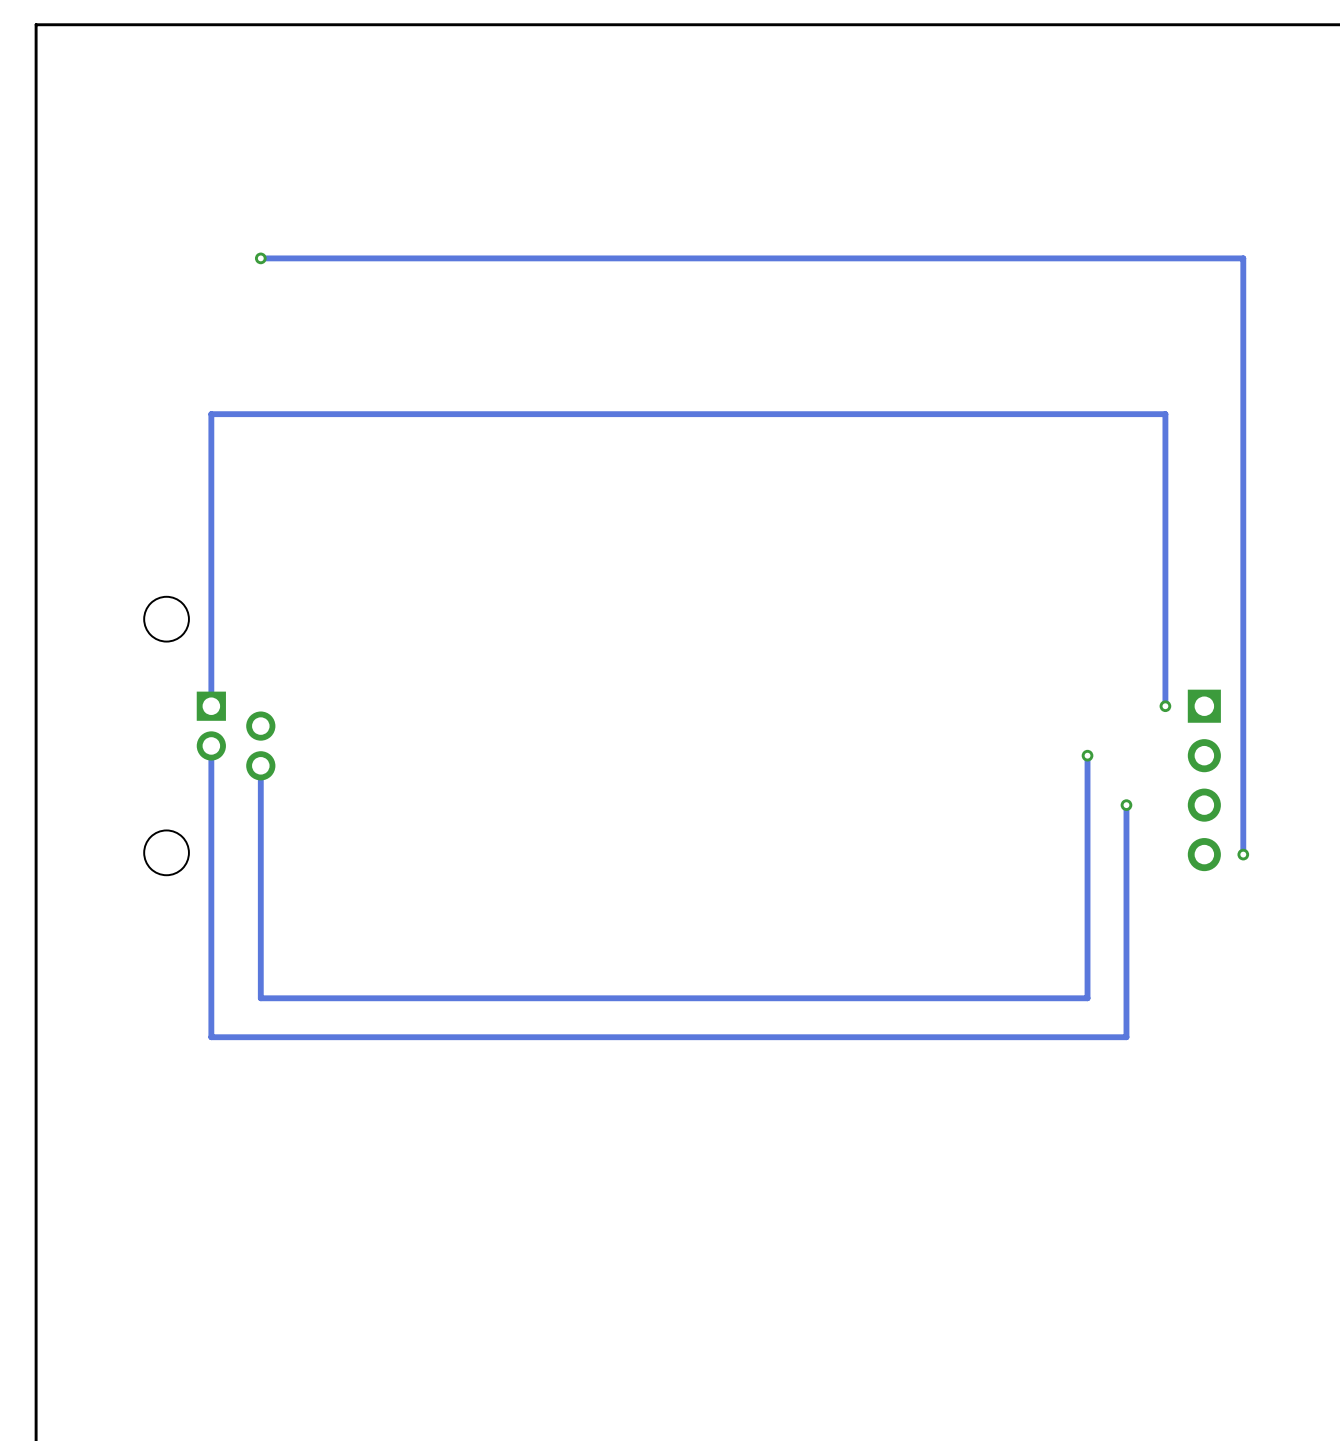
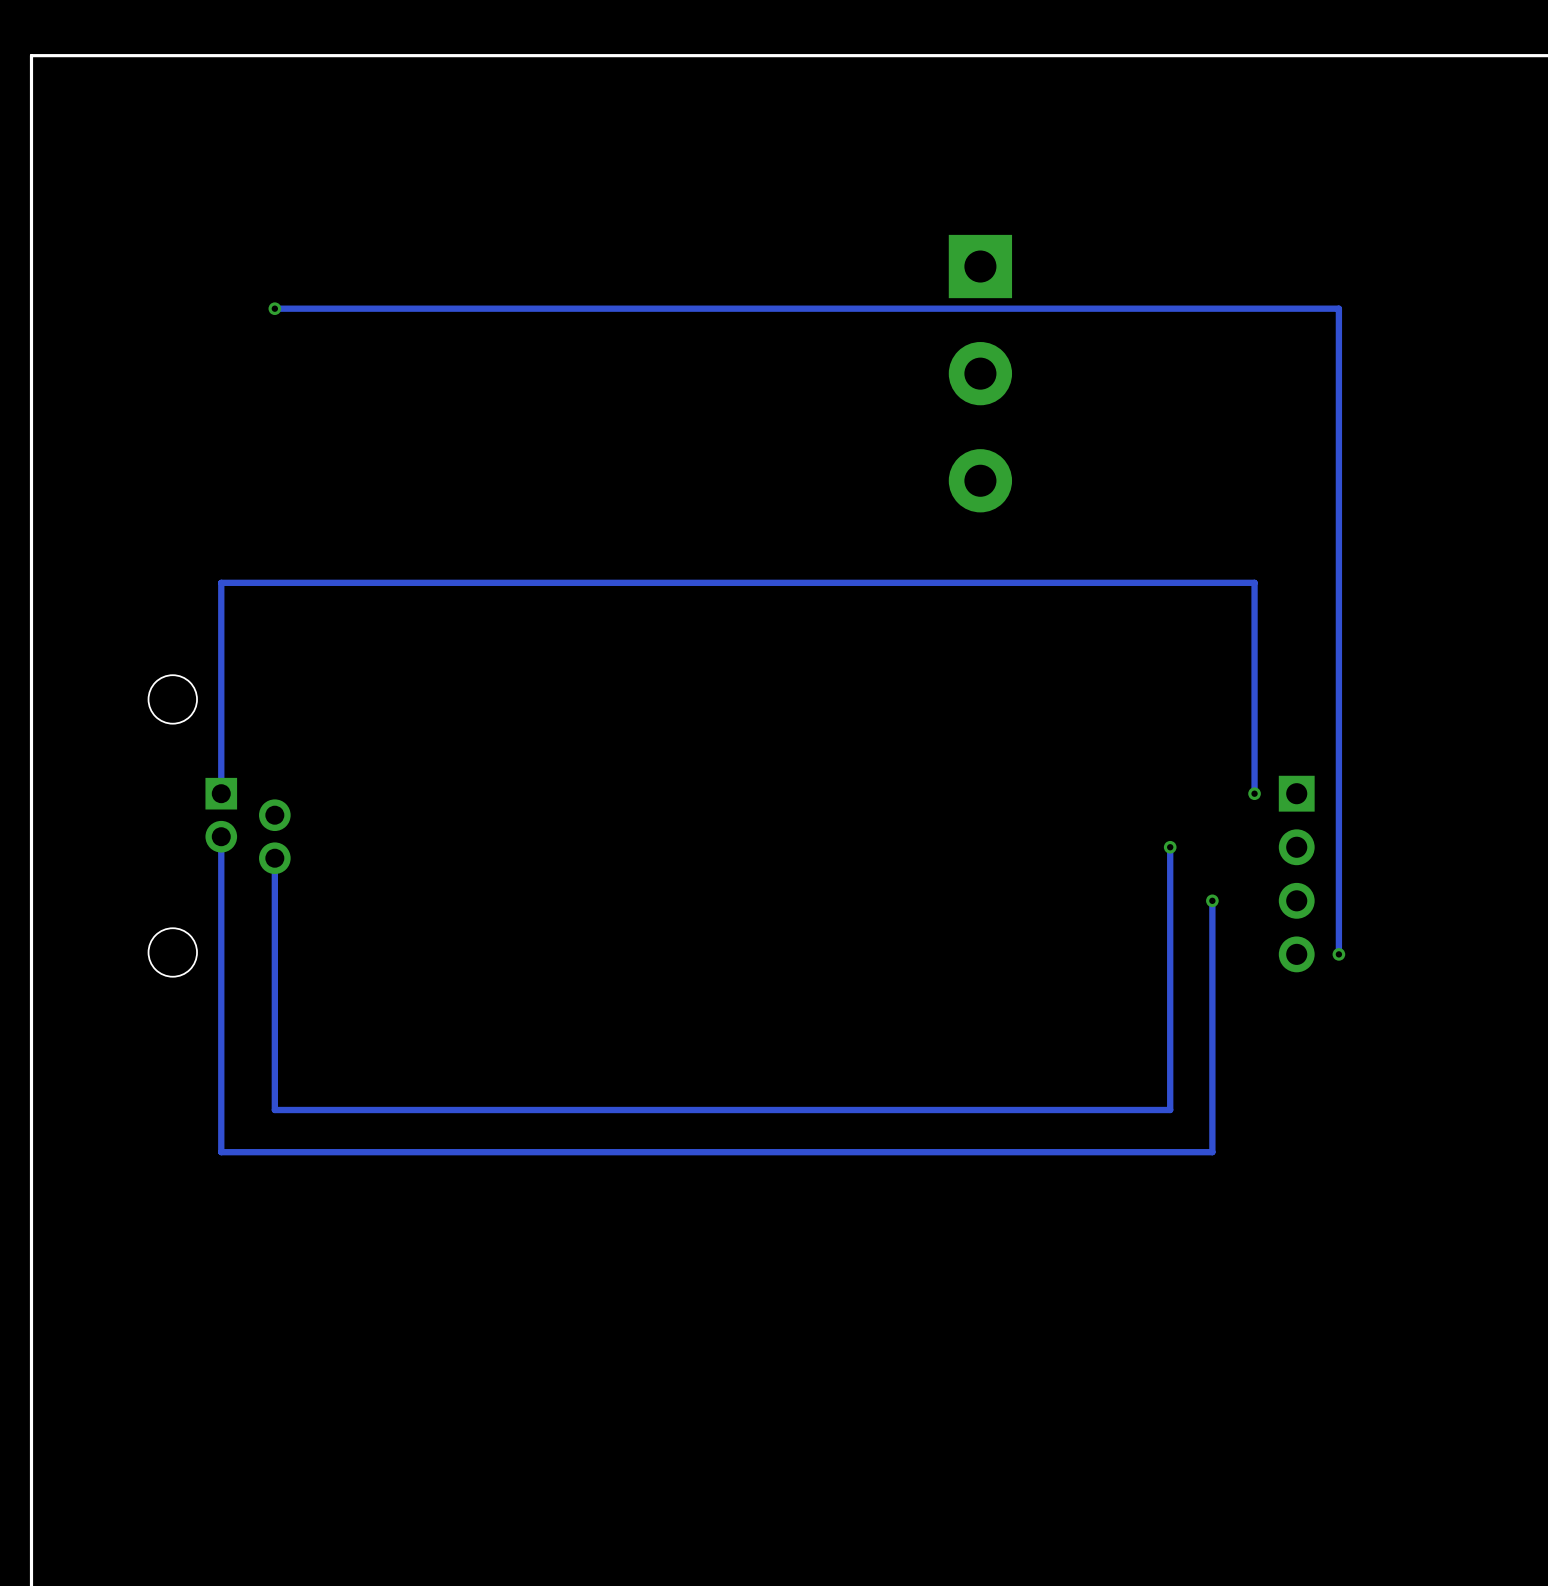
part: none -> (980, 373)
track: (1165, 511) (1165, 414) (211, 414) (211, 511) -> (1254, 582) (221, 582)

